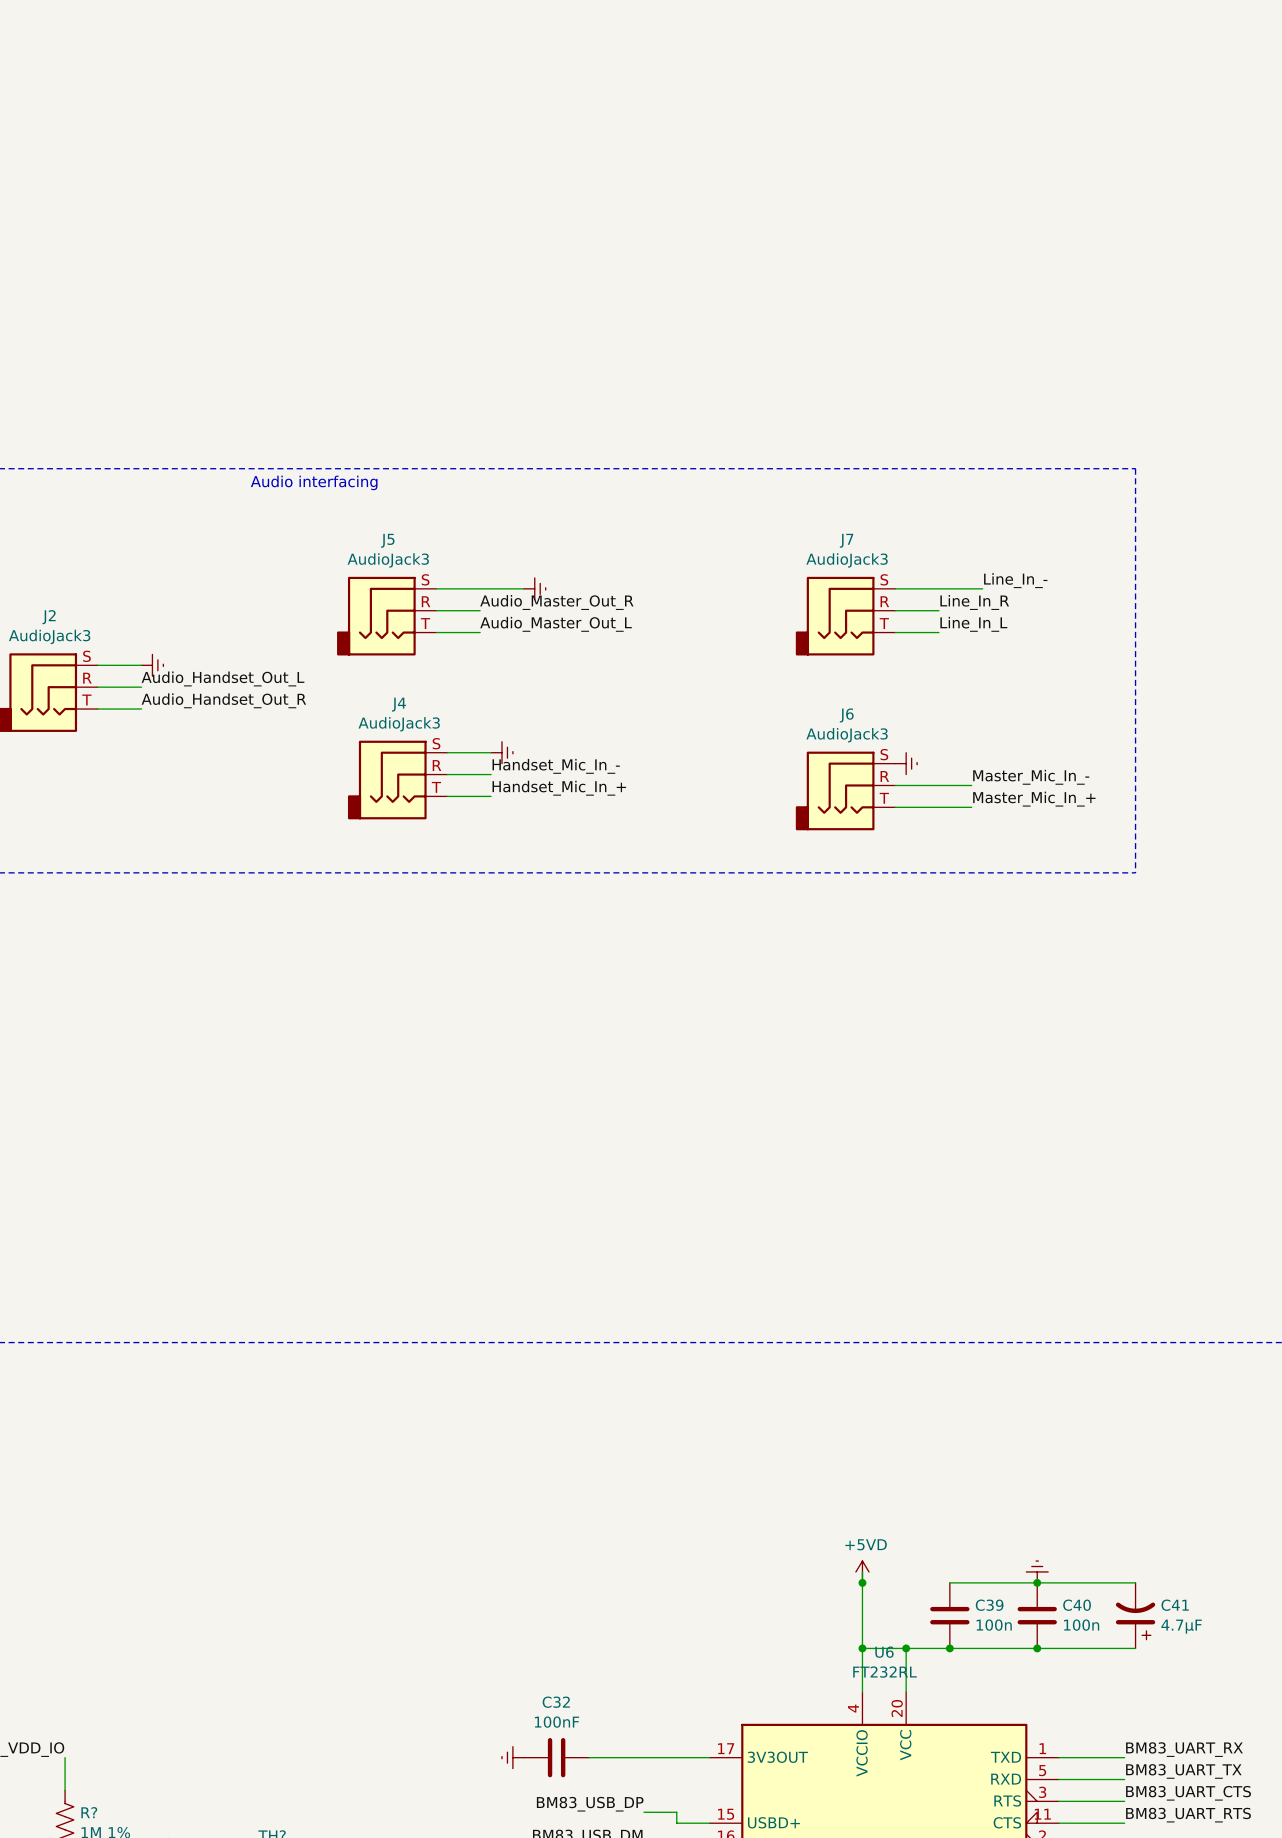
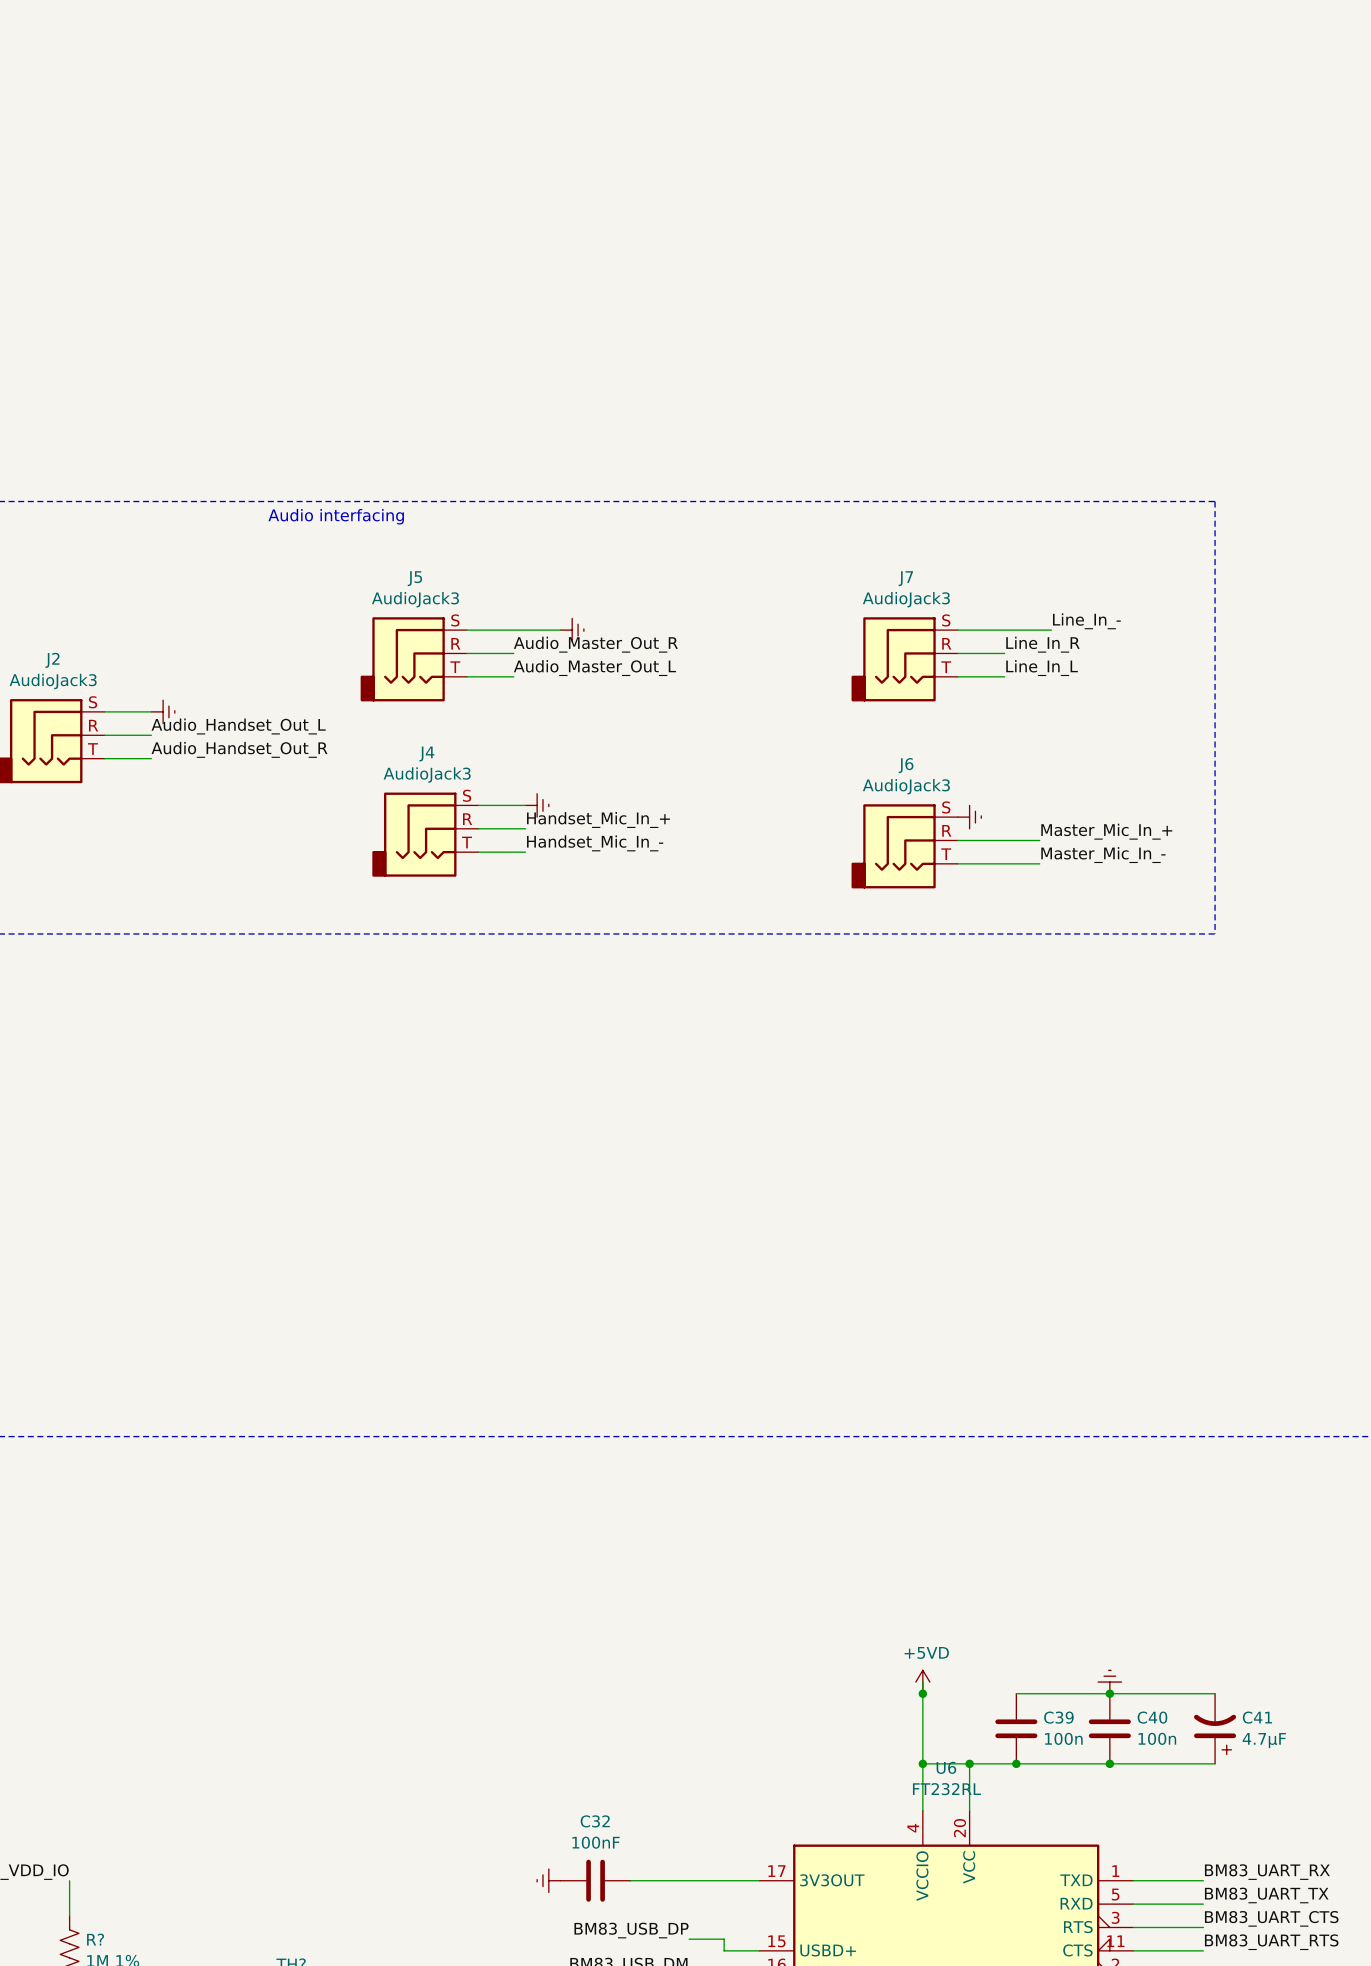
label: Handset_Mic_In_- (556, 766) -> Handset_Mic_In_+ (598, 820)
label: Master_Mic_In_- (1031, 777) -> Master_Mic_In_+ (1106, 831)
label: Handset_Mic_In_+ (559, 788) -> Handset_Mic_In_- (595, 843)
label: Master_Mic_In_+ (1034, 799) -> Master_Mic_In_- (1103, 855)

